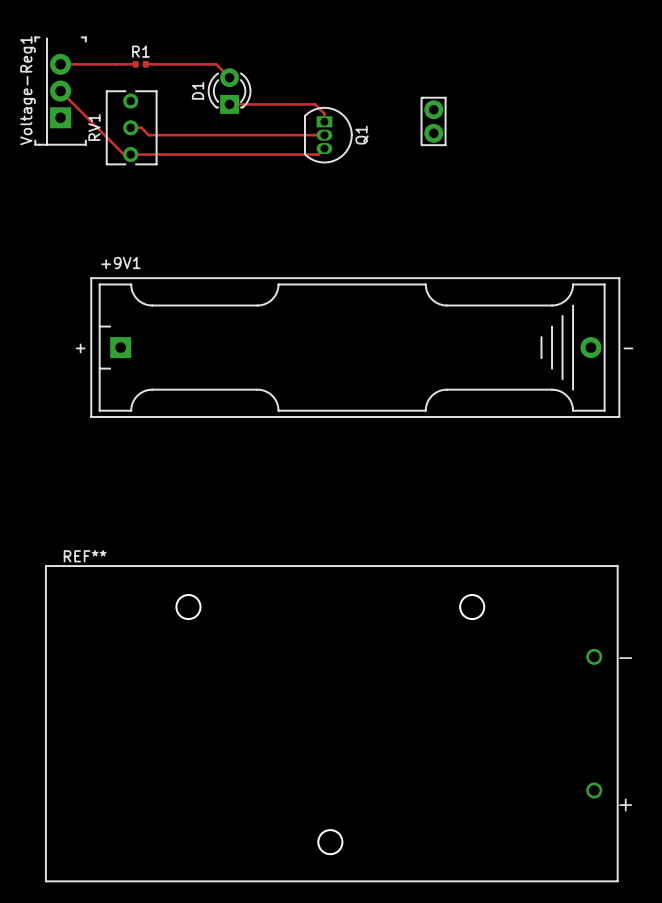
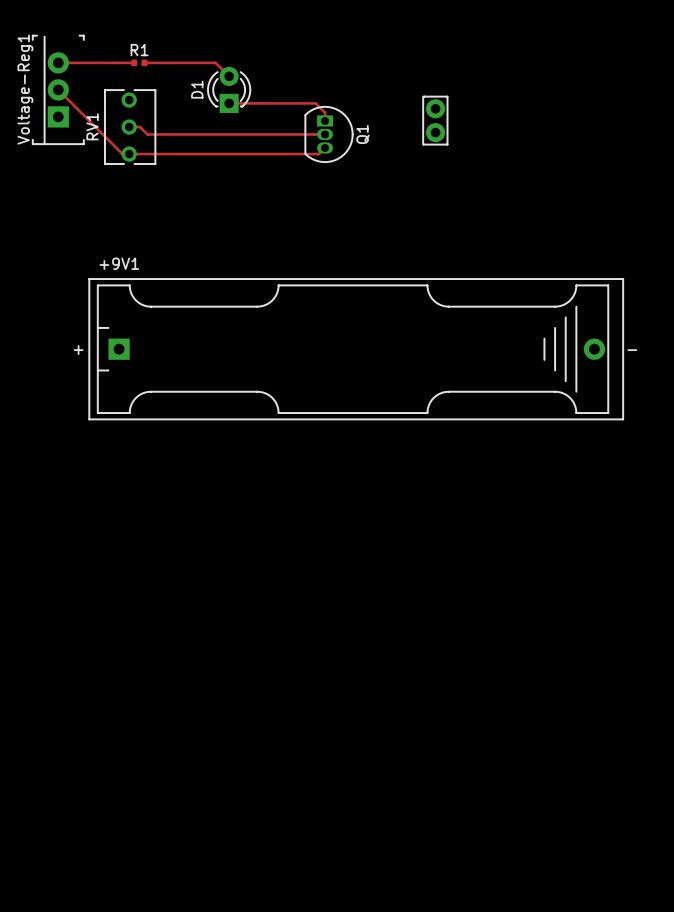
REF**: (331, 723) -> none

